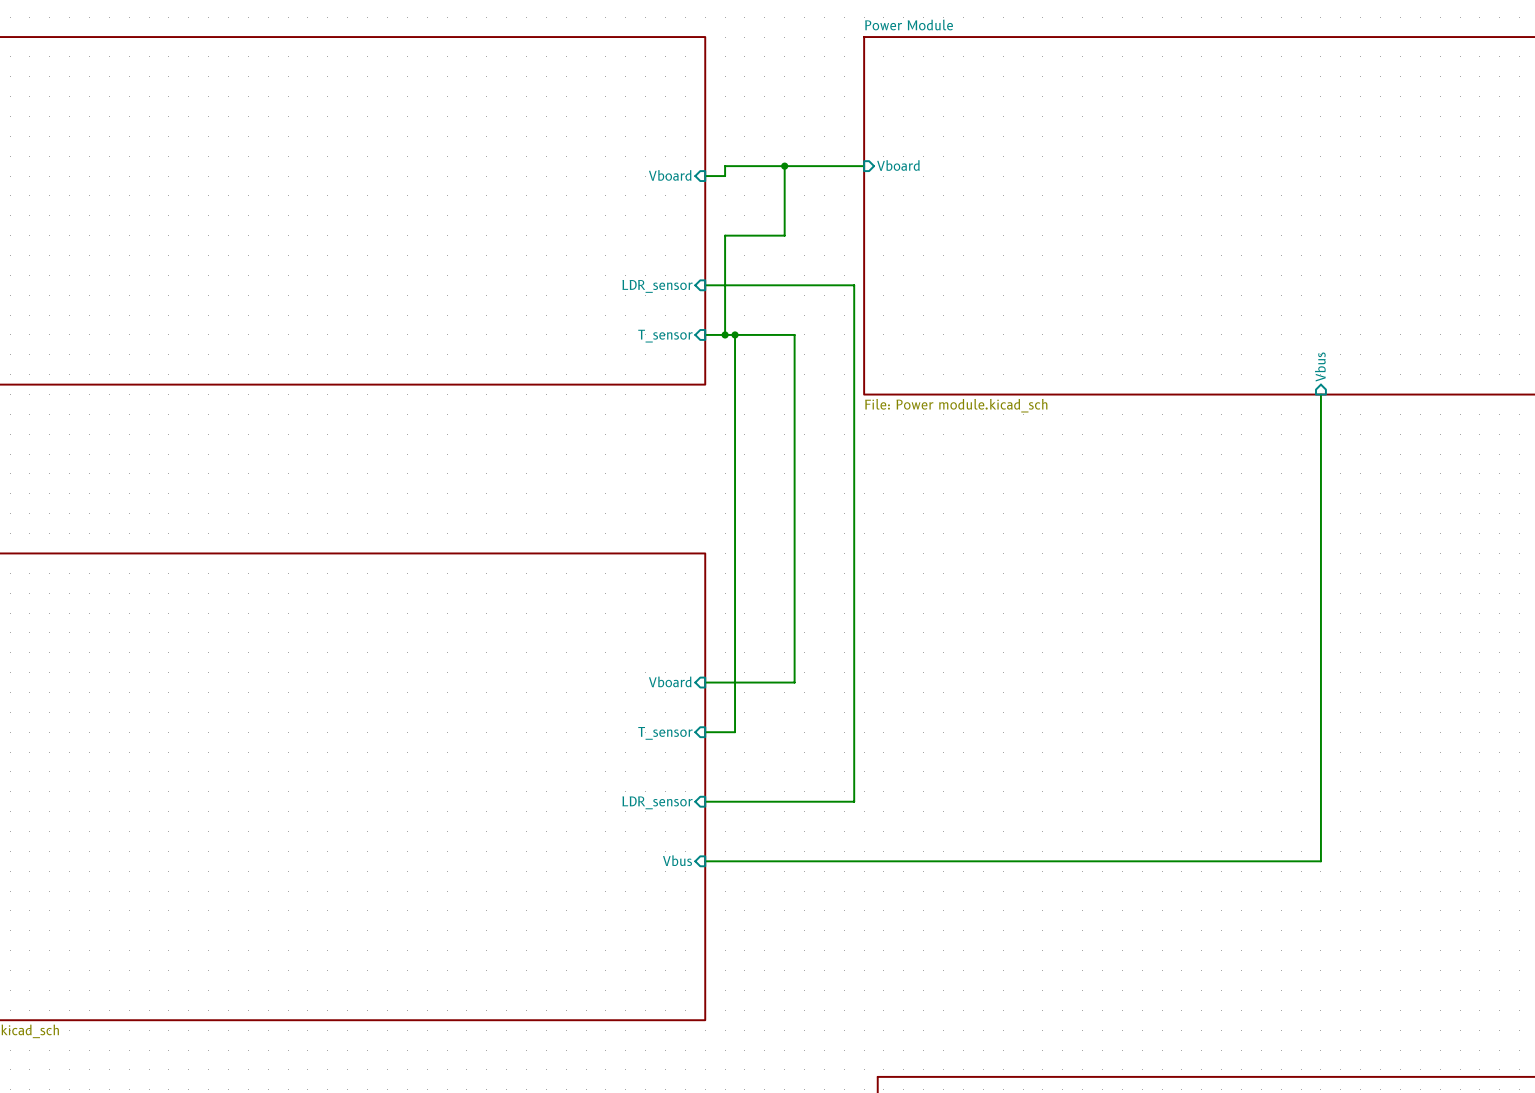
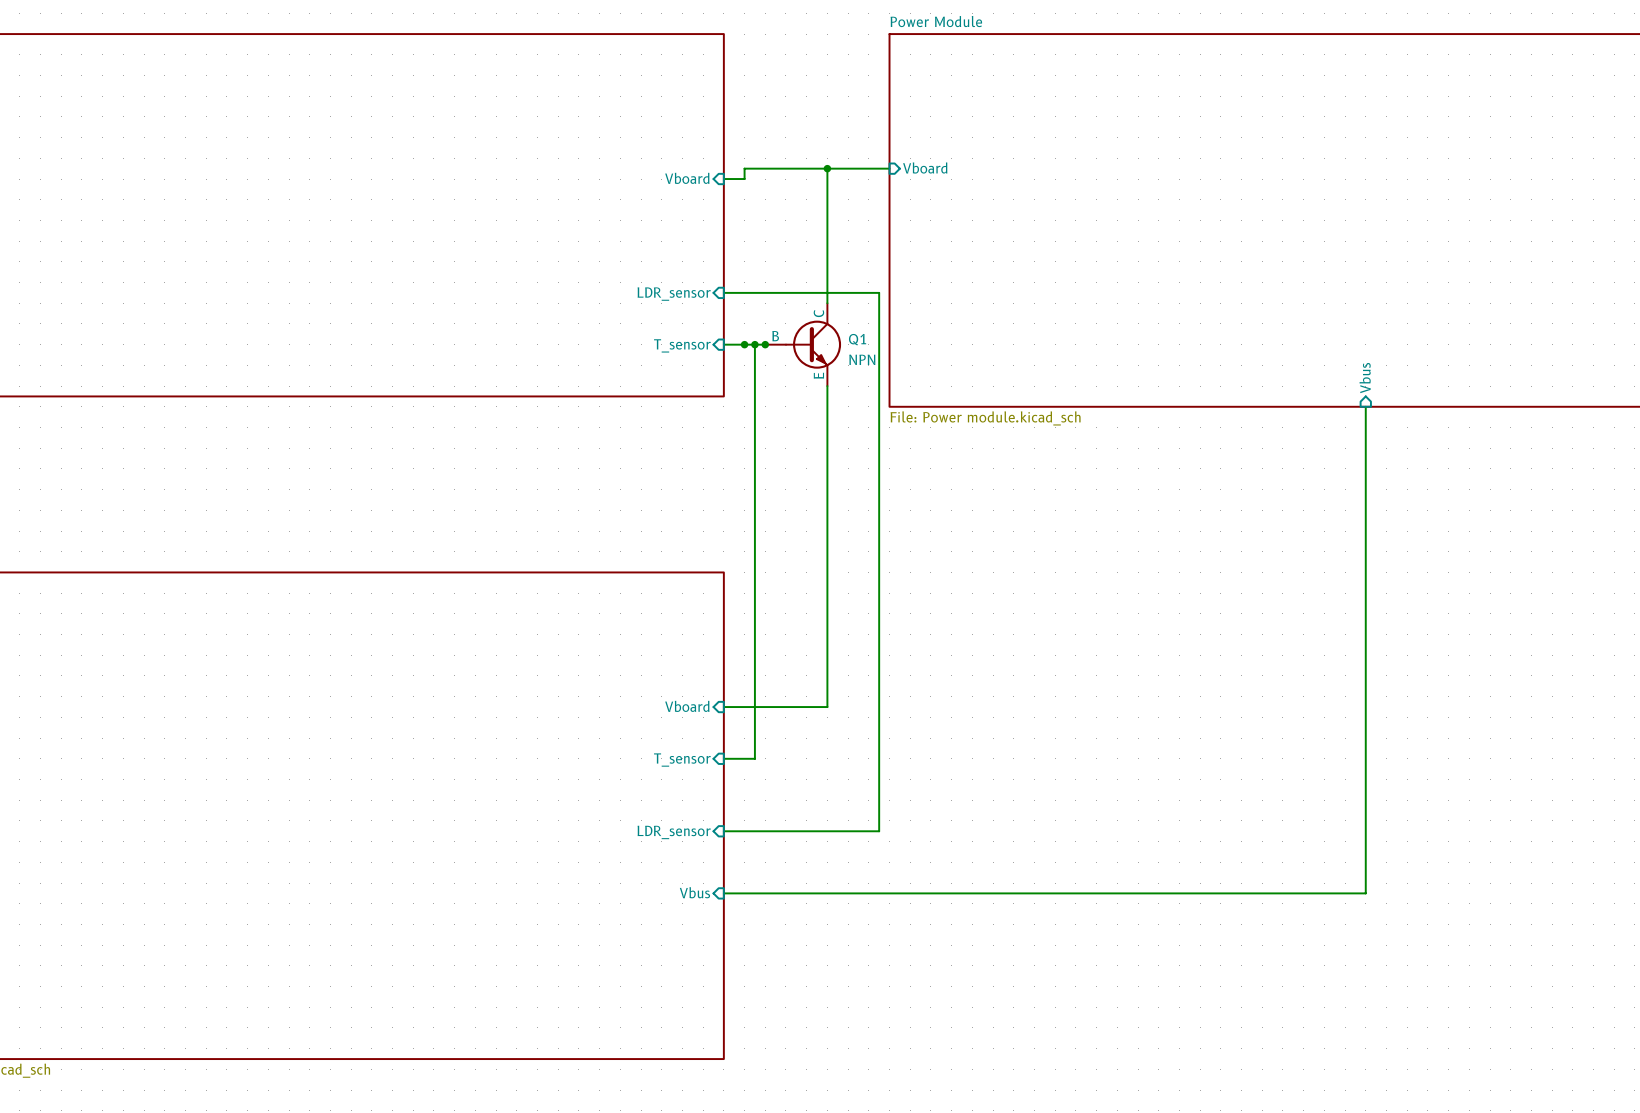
wire: (784, 166) (784, 235) (725, 235) (725, 334) -> none
junction position: (784, 166) -> (827, 168)
wire: none -> (827, 168) (827, 303)
wire: (744, 334) (794, 334) (794, 682) -> (827, 386) (827, 707) (817, 707)
junction: none -> (765, 344)
Q1: none -> NPN (803, 344)

